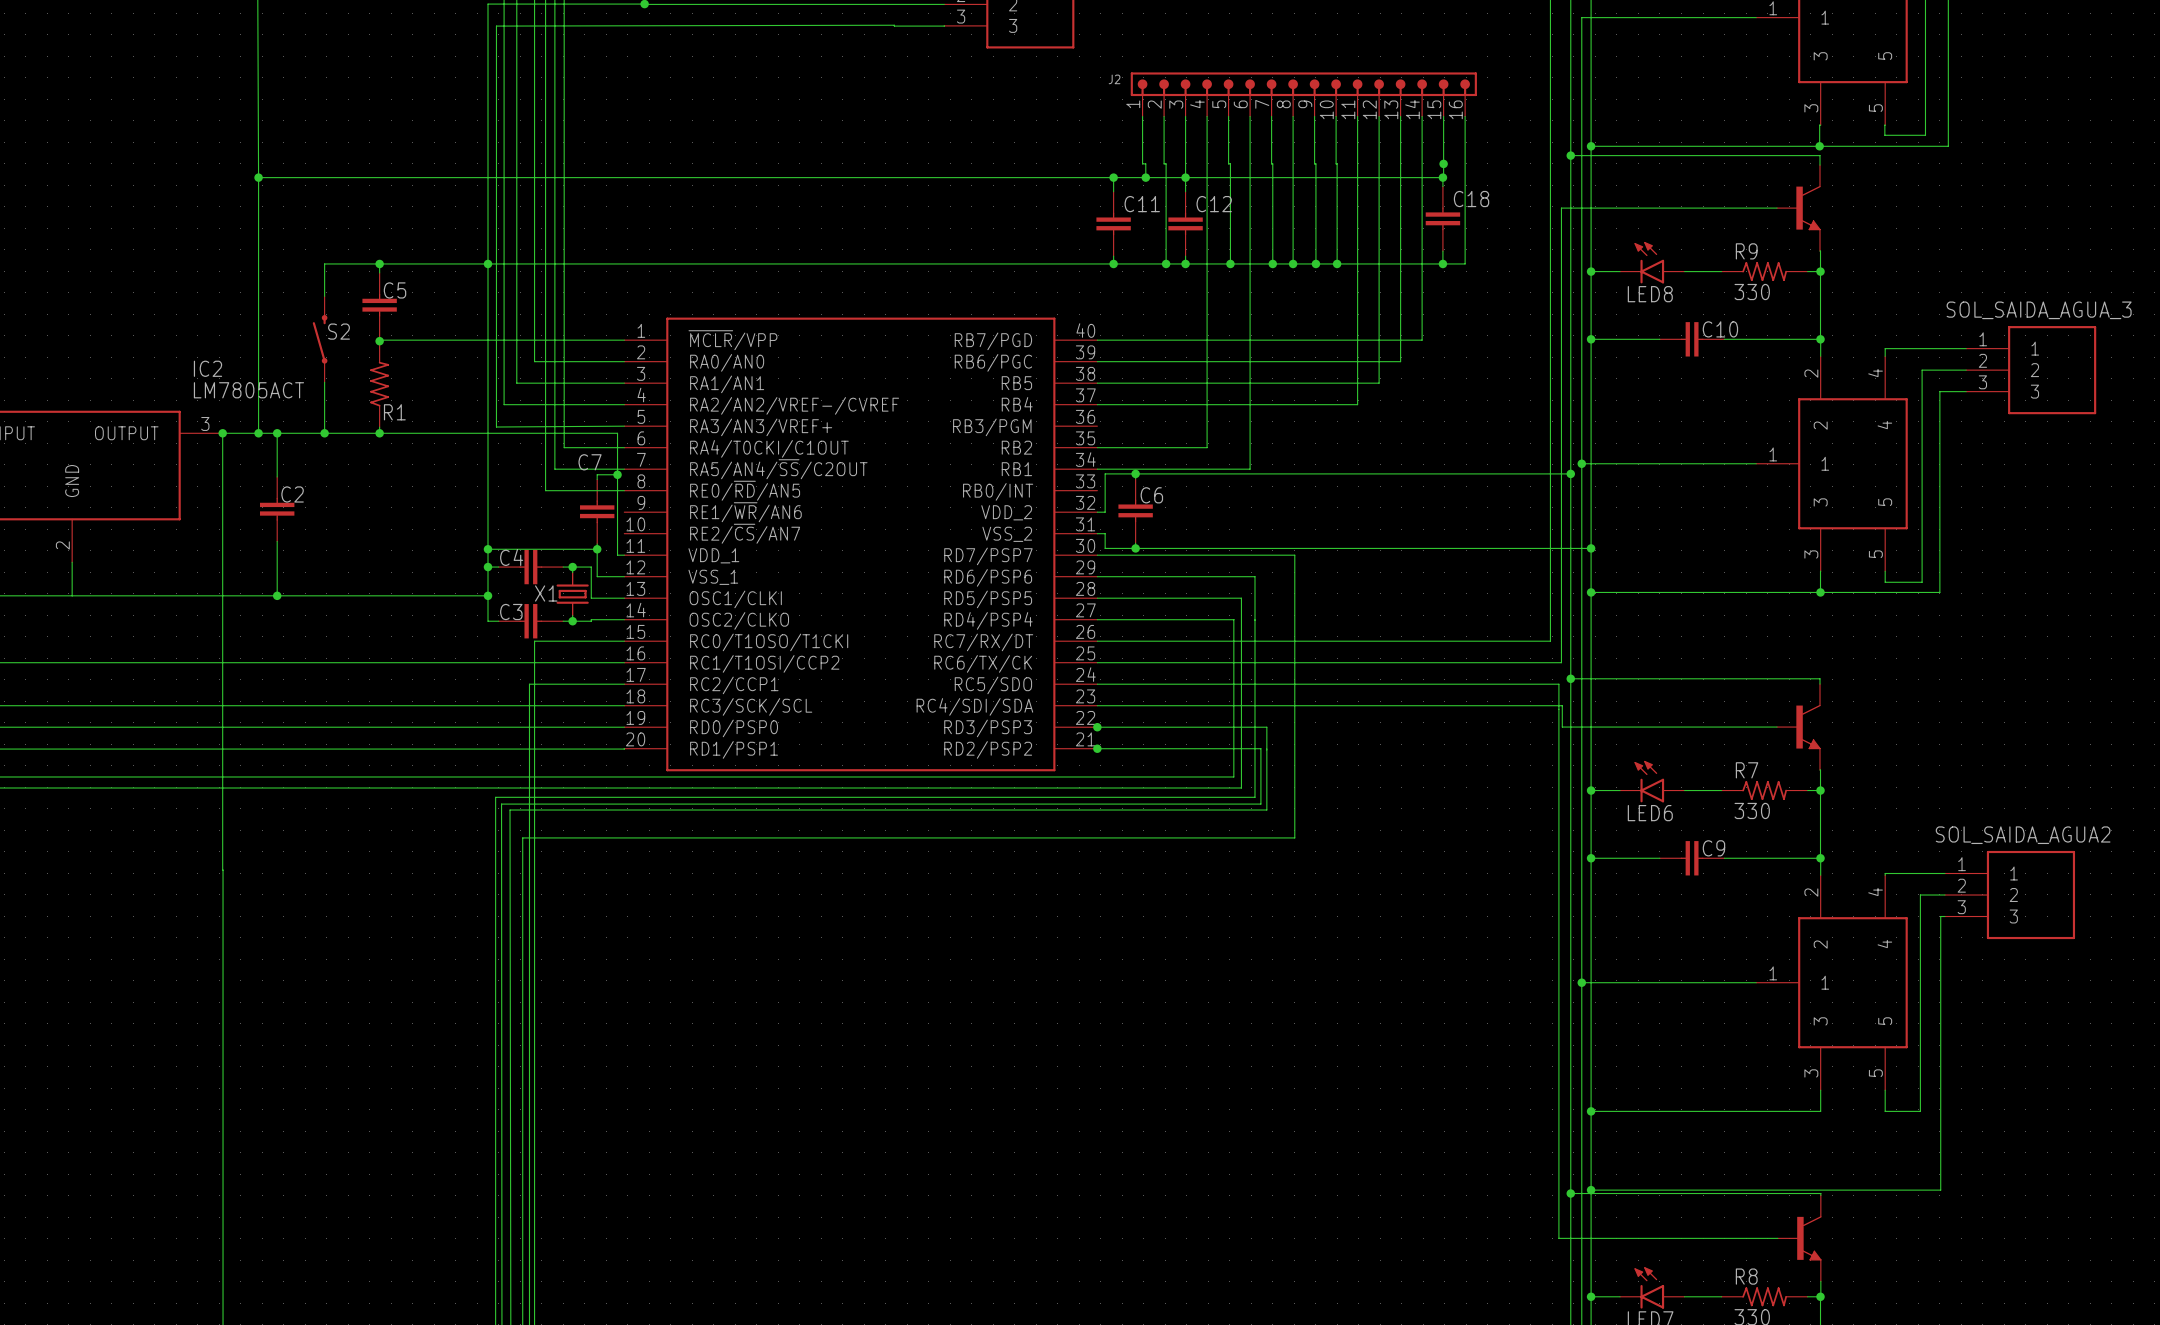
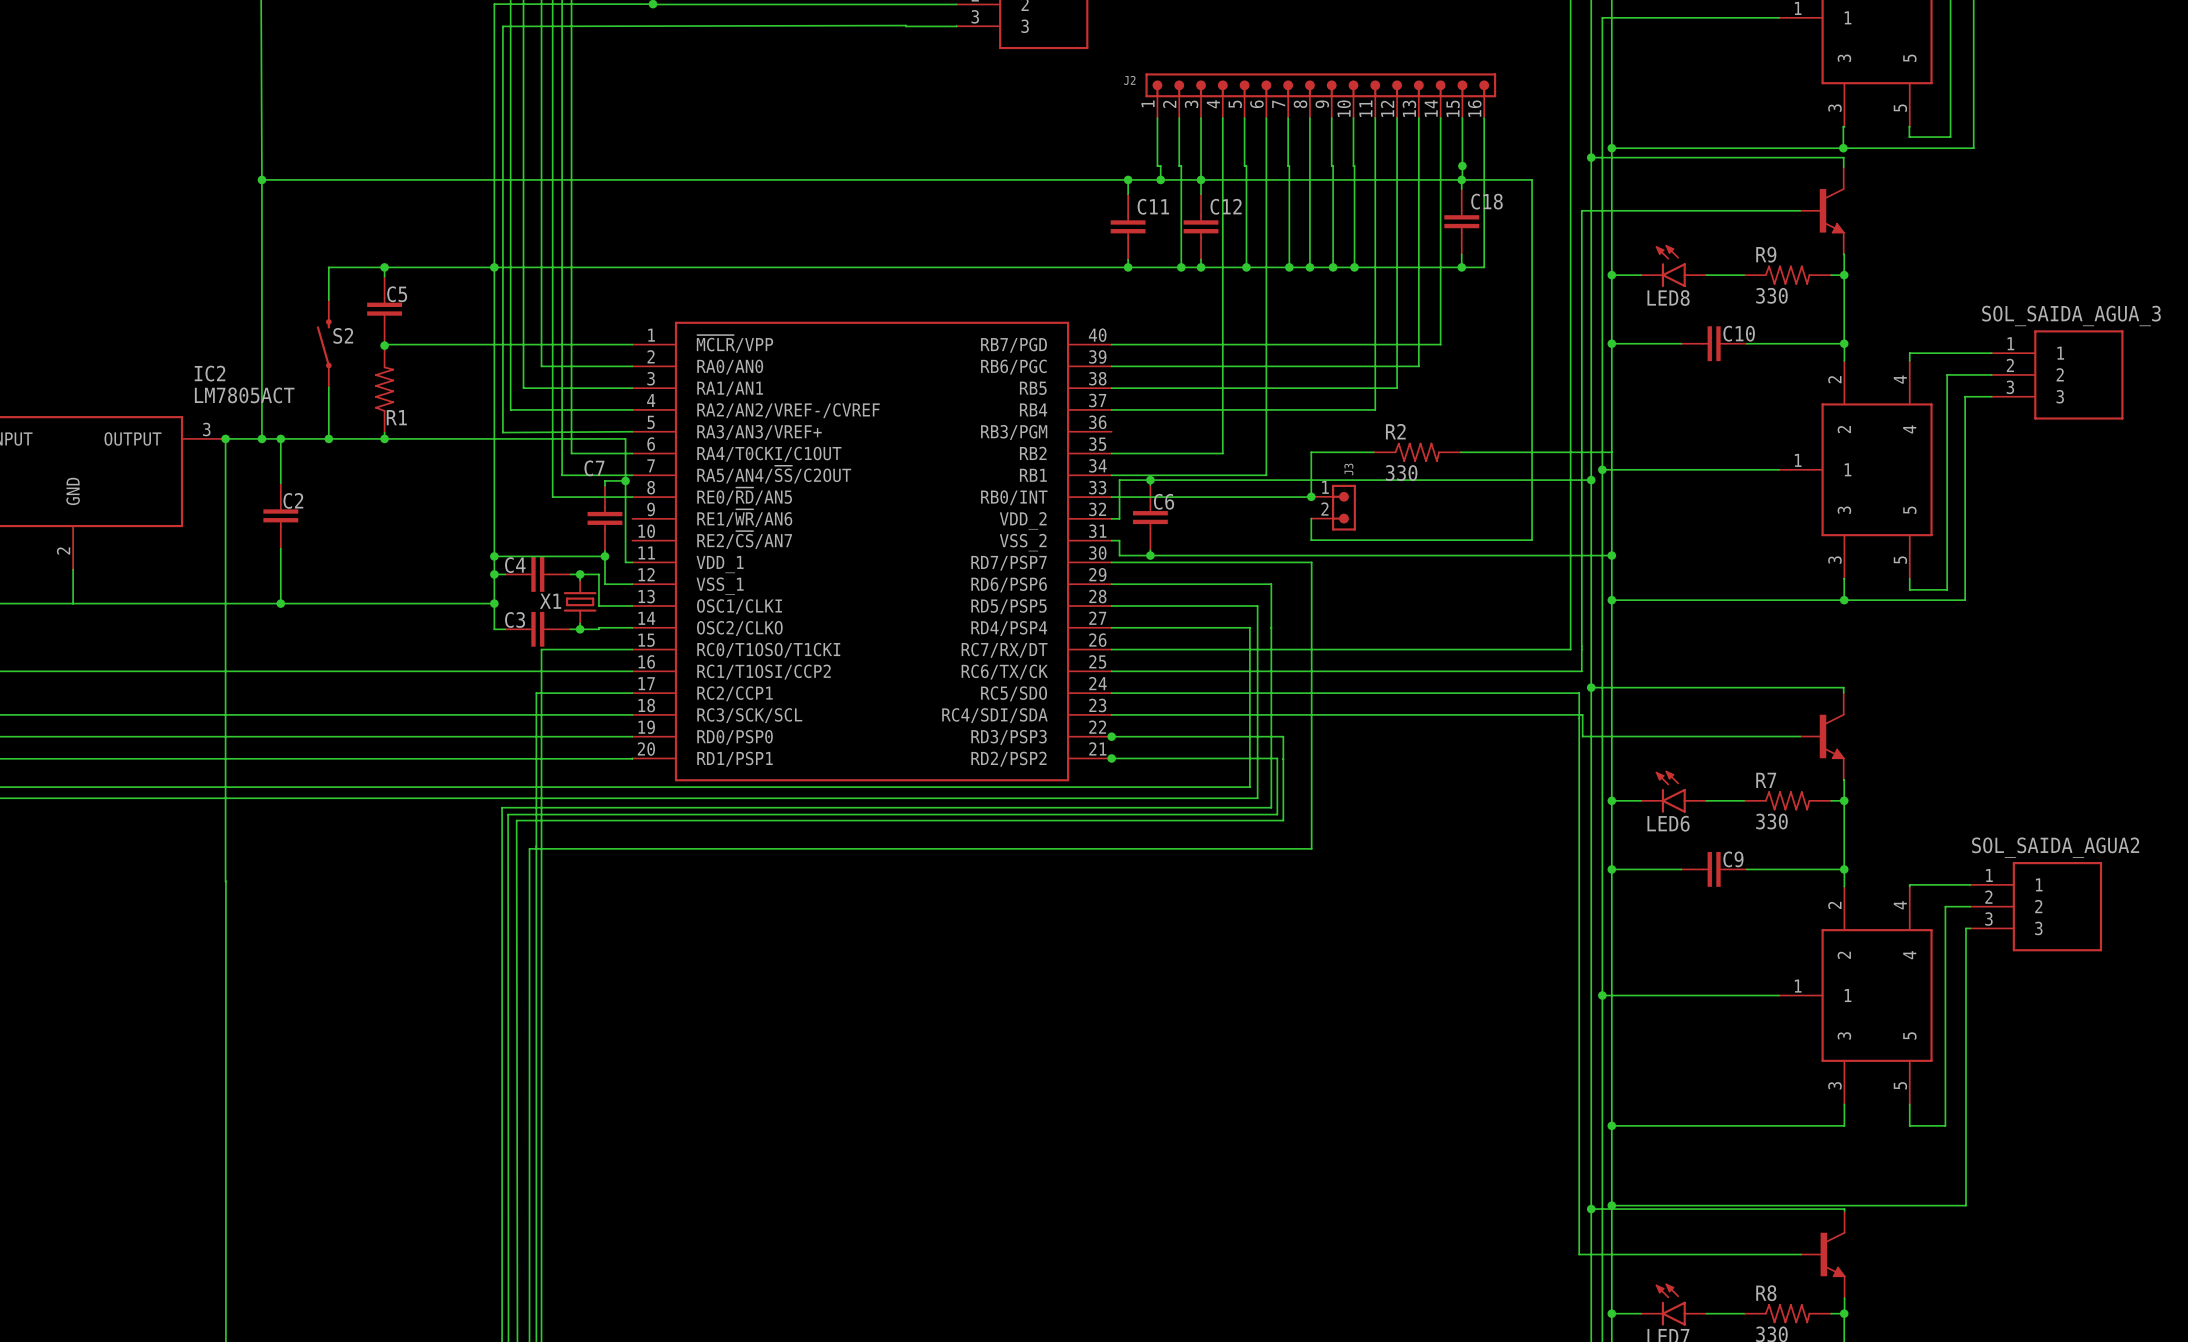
wire: none -> (1463, 179) (1532, 179) (1532, 540) (1311, 540) (1311, 518)
wire: none -> (1373, 452) (1311, 452) (1311, 497) (1111, 497)
R2: none -> 330 (1417, 452)
wire: none -> (1460, 452) (1611, 452)
junction: none -> (1311, 496)
J3: none -> (1333, 507)

